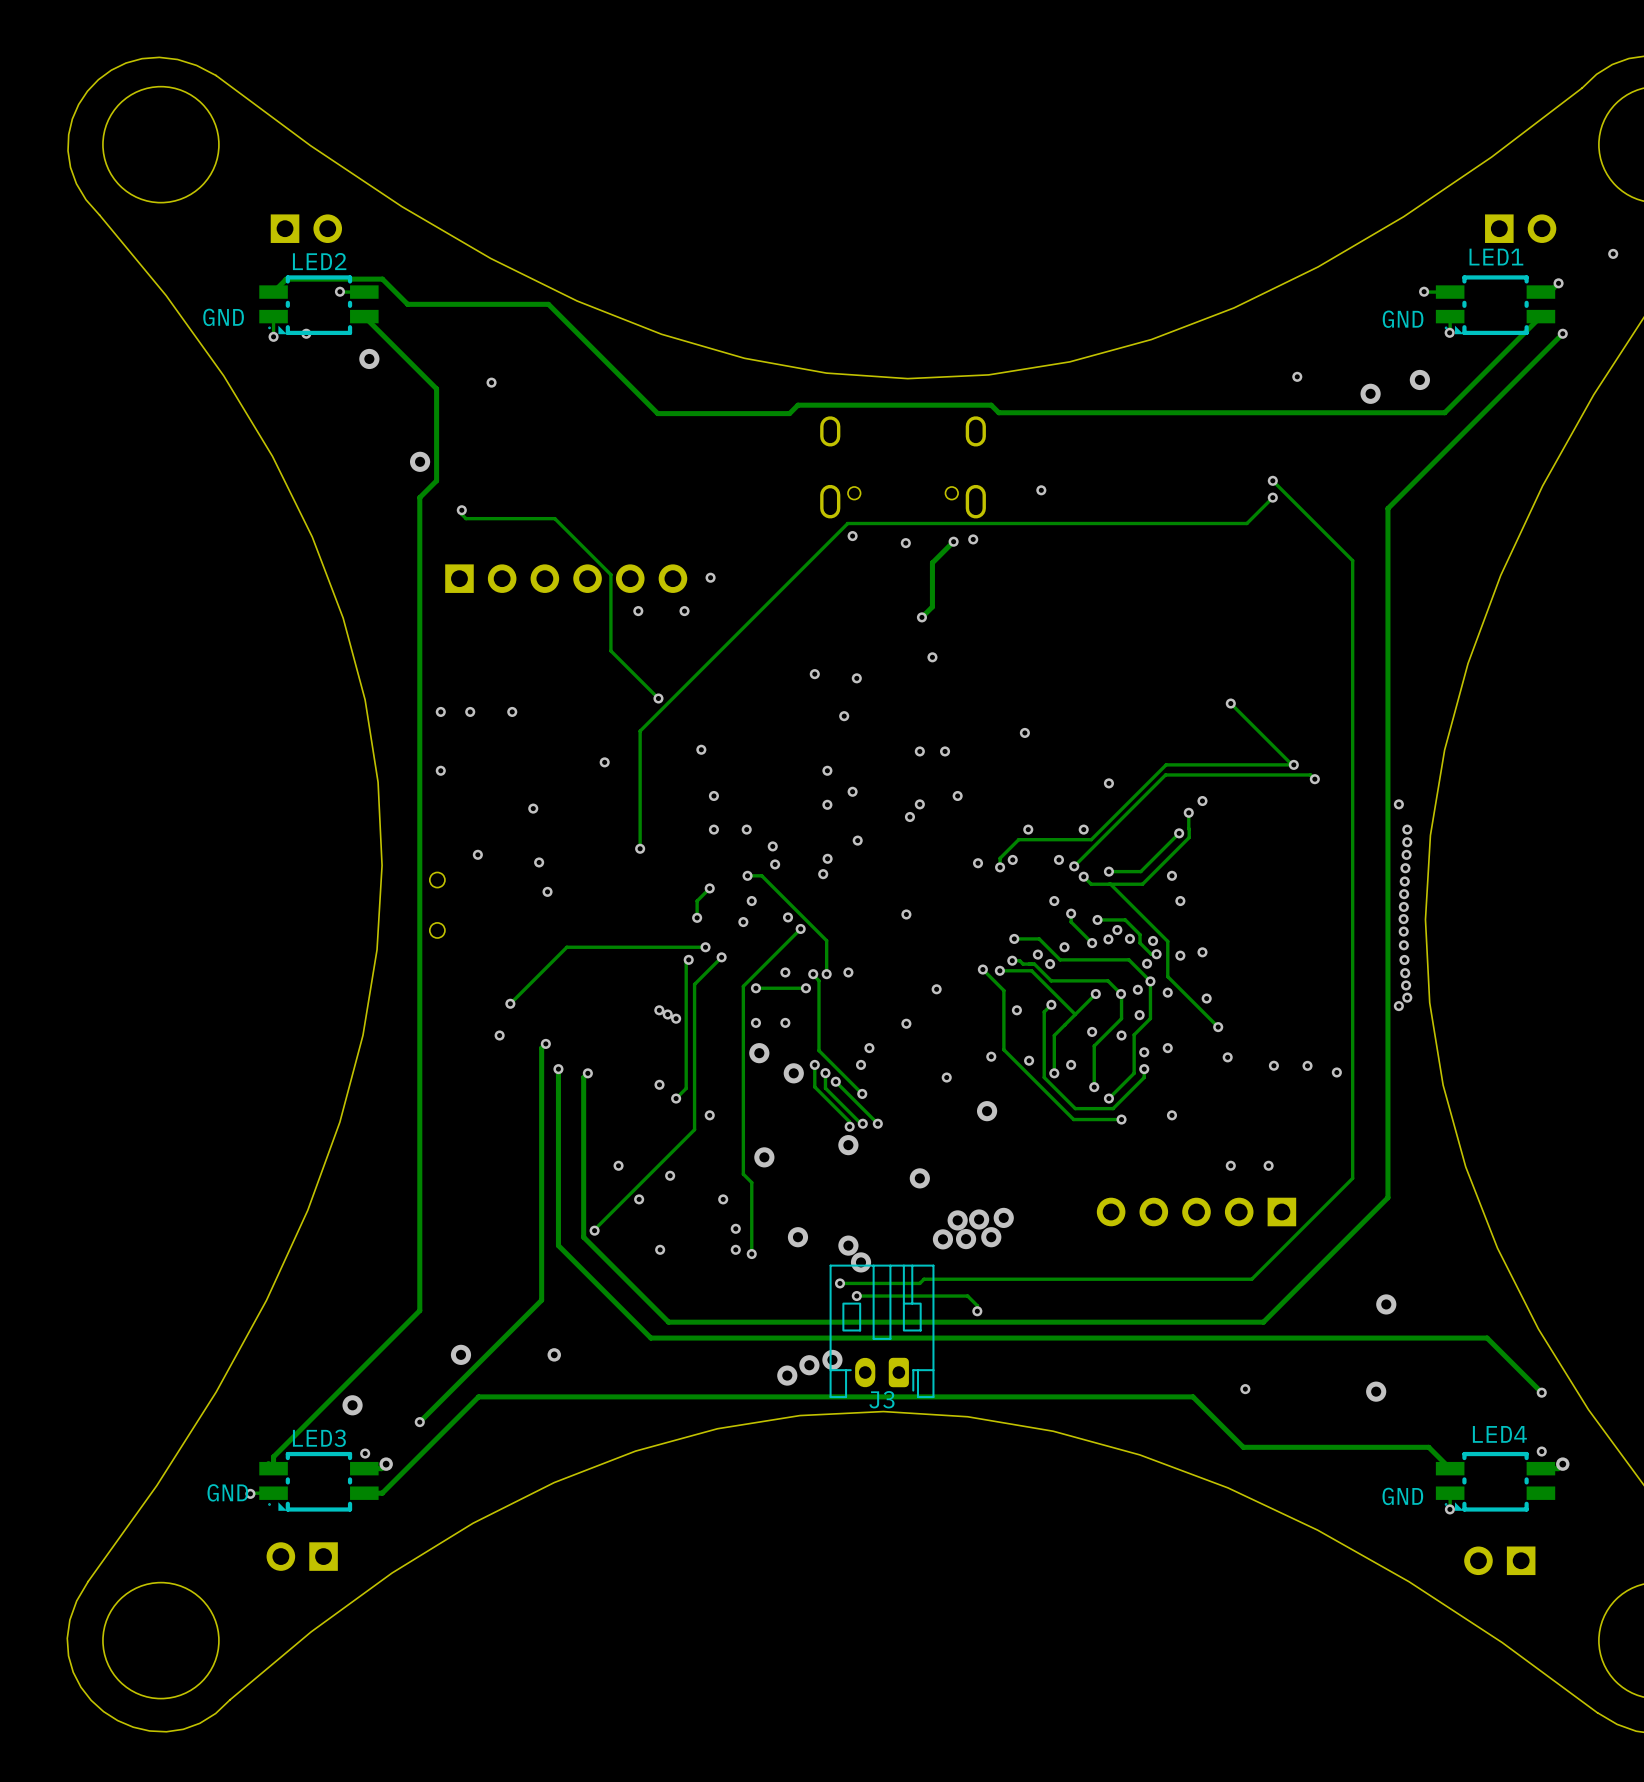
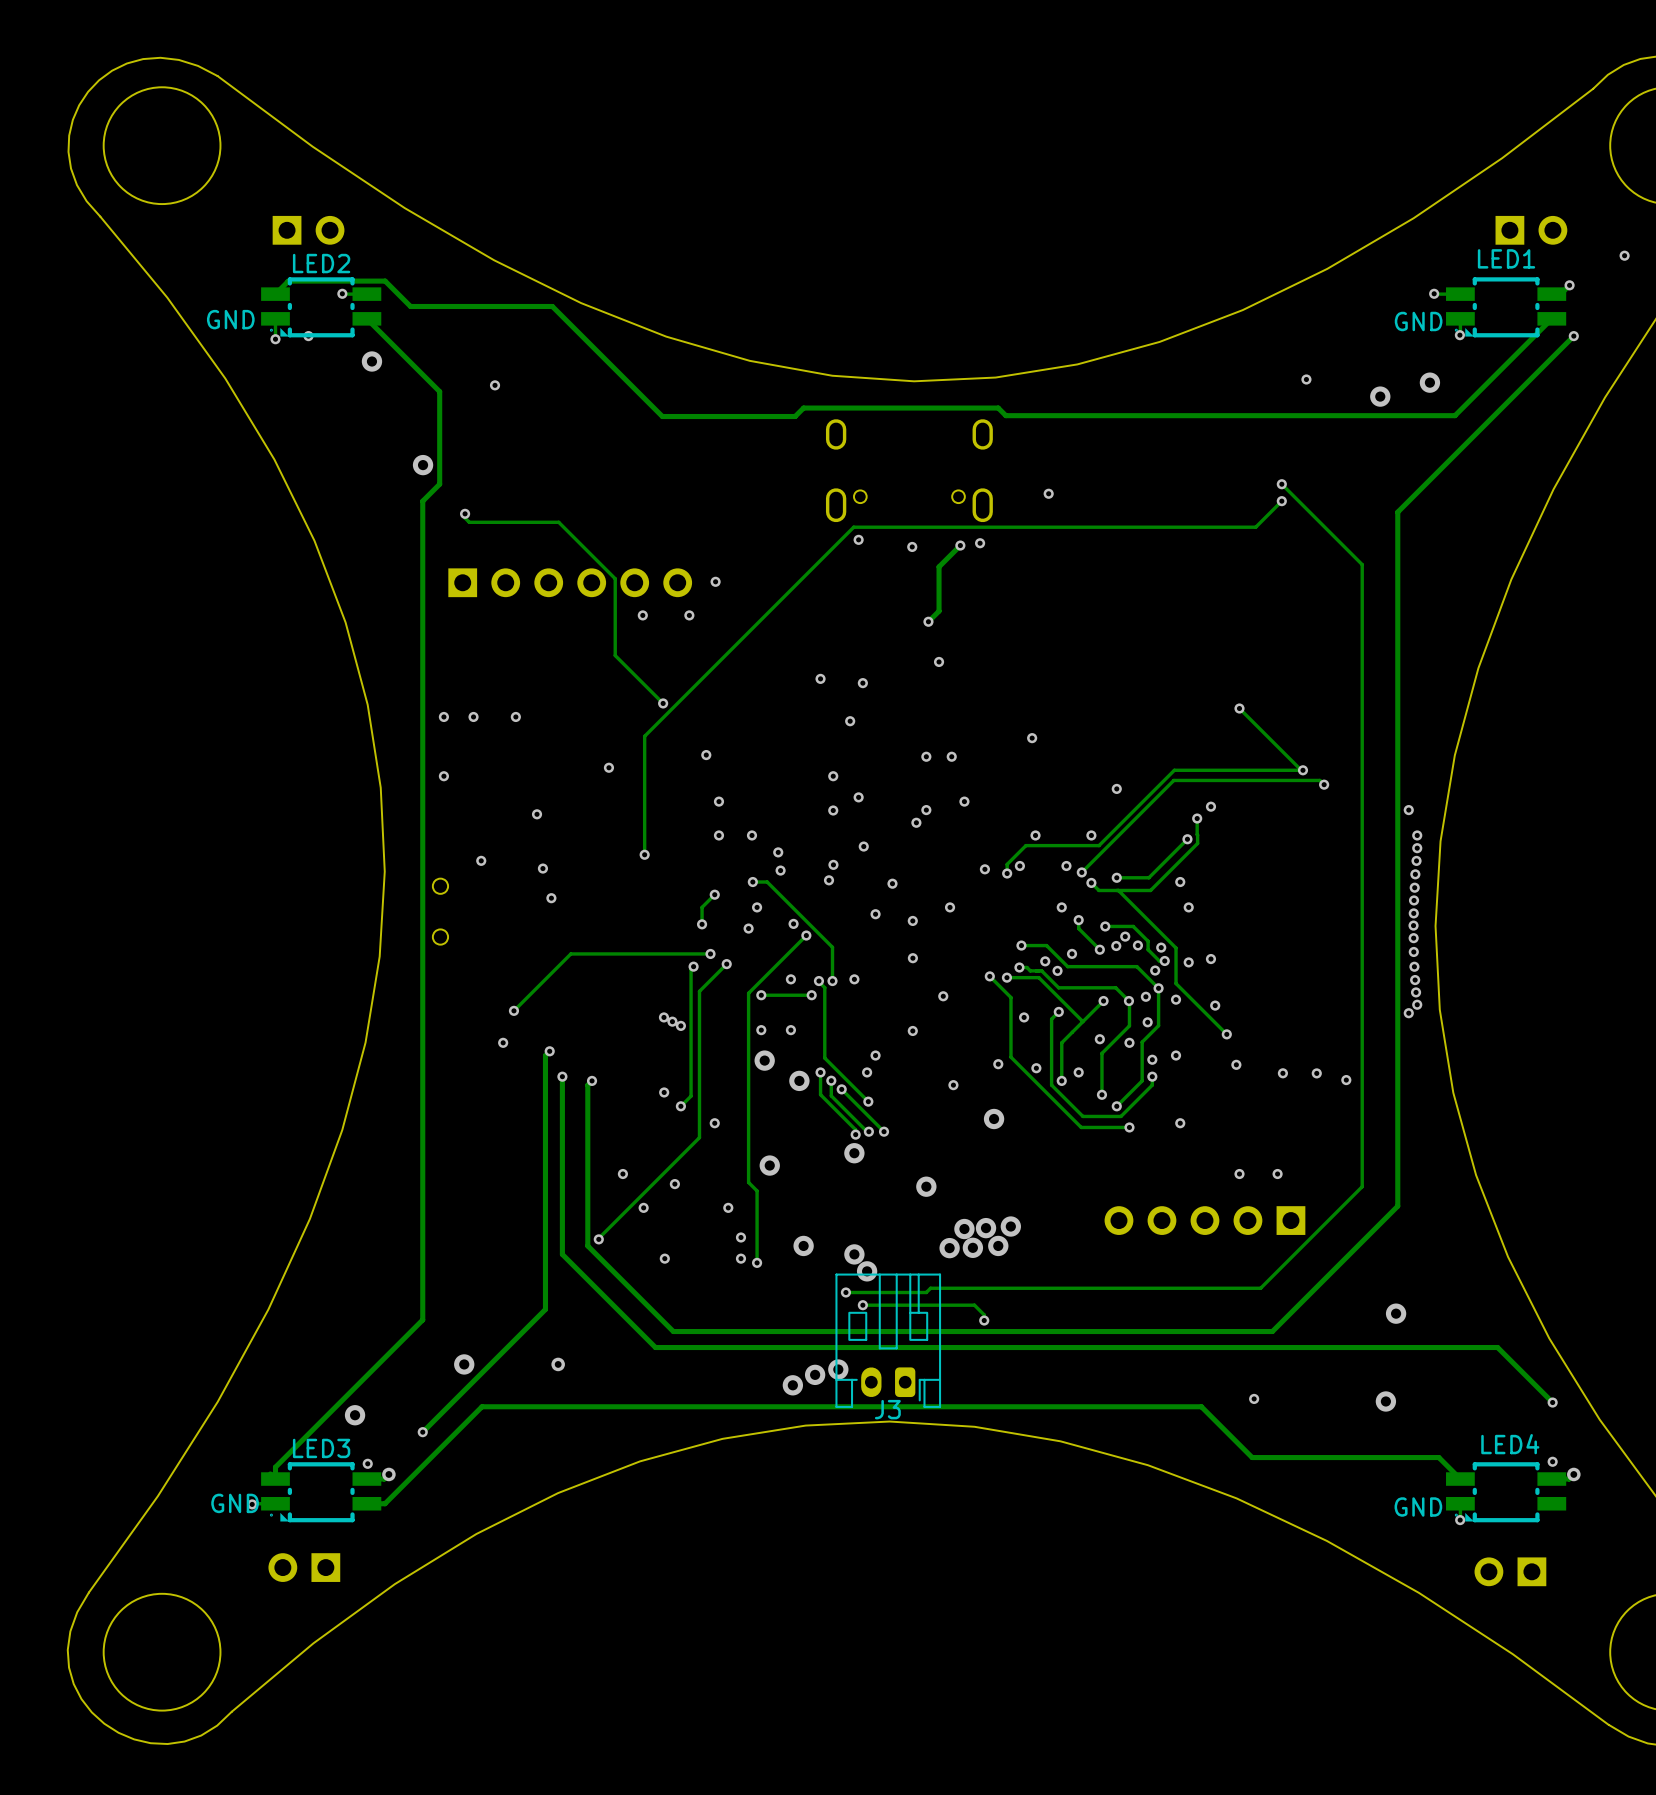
via: none -> (892, 883)
via: none -> (950, 907)
via: none -> (875, 914)
via: none -> (912, 958)

